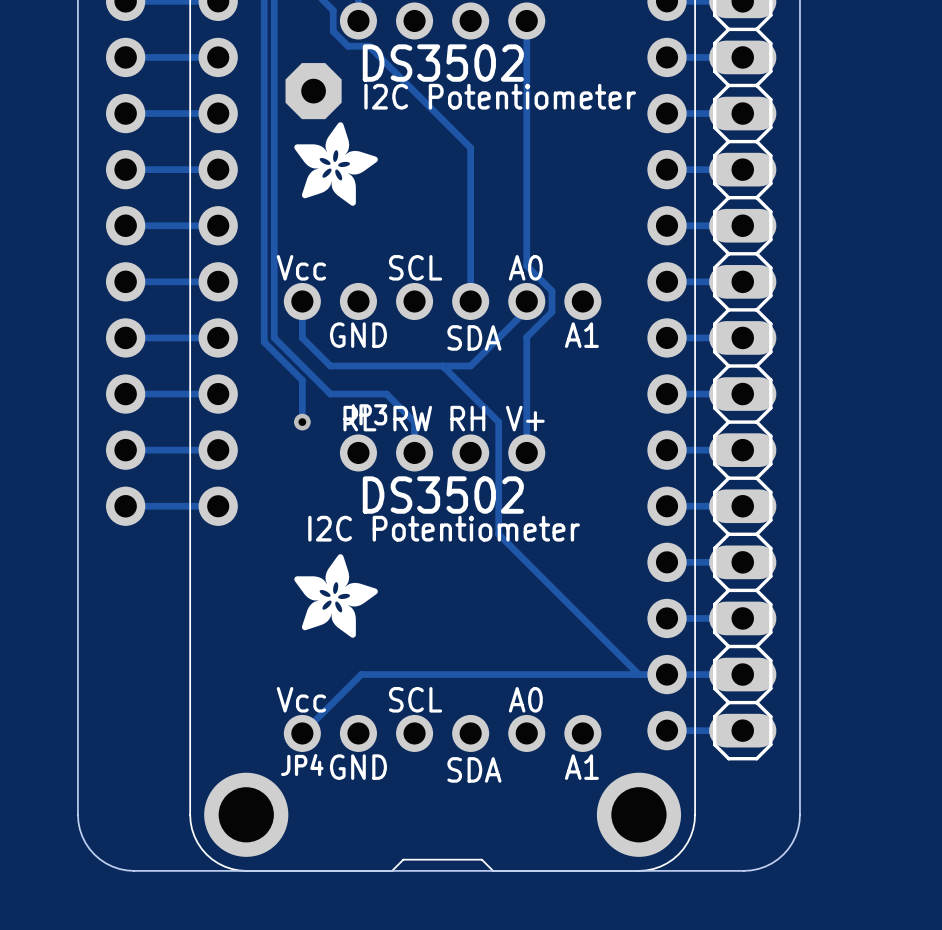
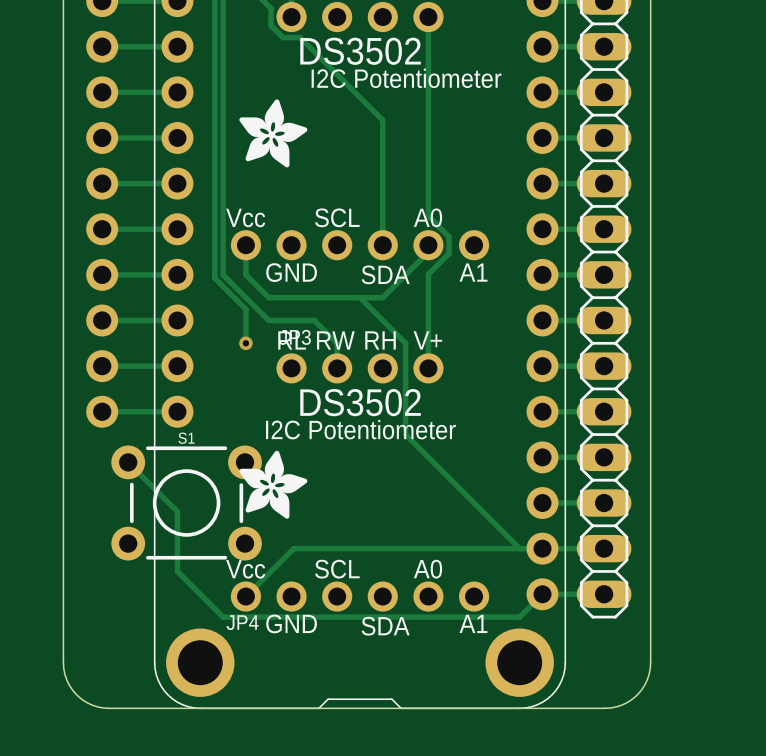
part: (313, 91) -> none
track: none -> (128, 462) (177, 511) (177, 571) (223, 617) (519, 617) (542, 594)
S1: none -> (186, 503)

